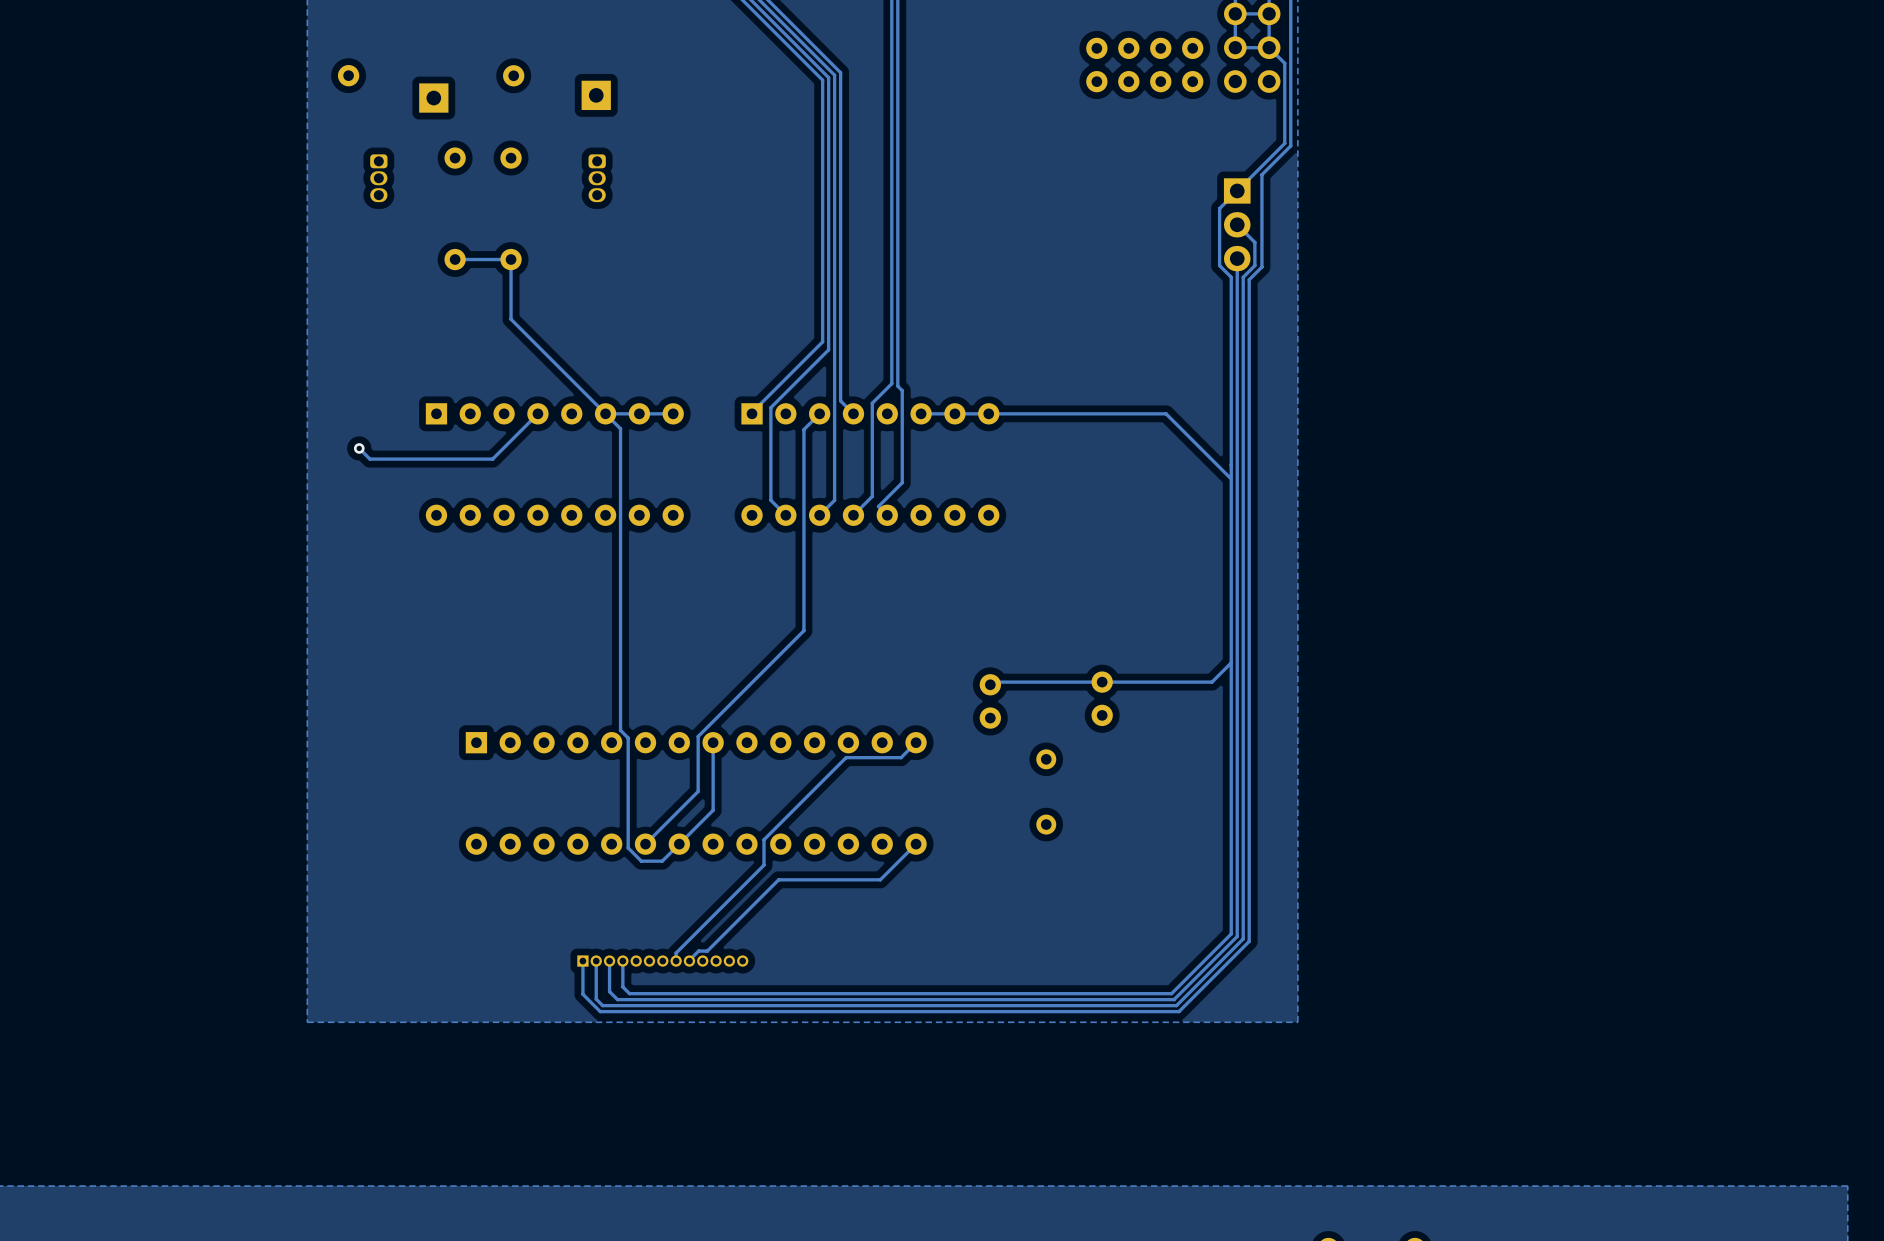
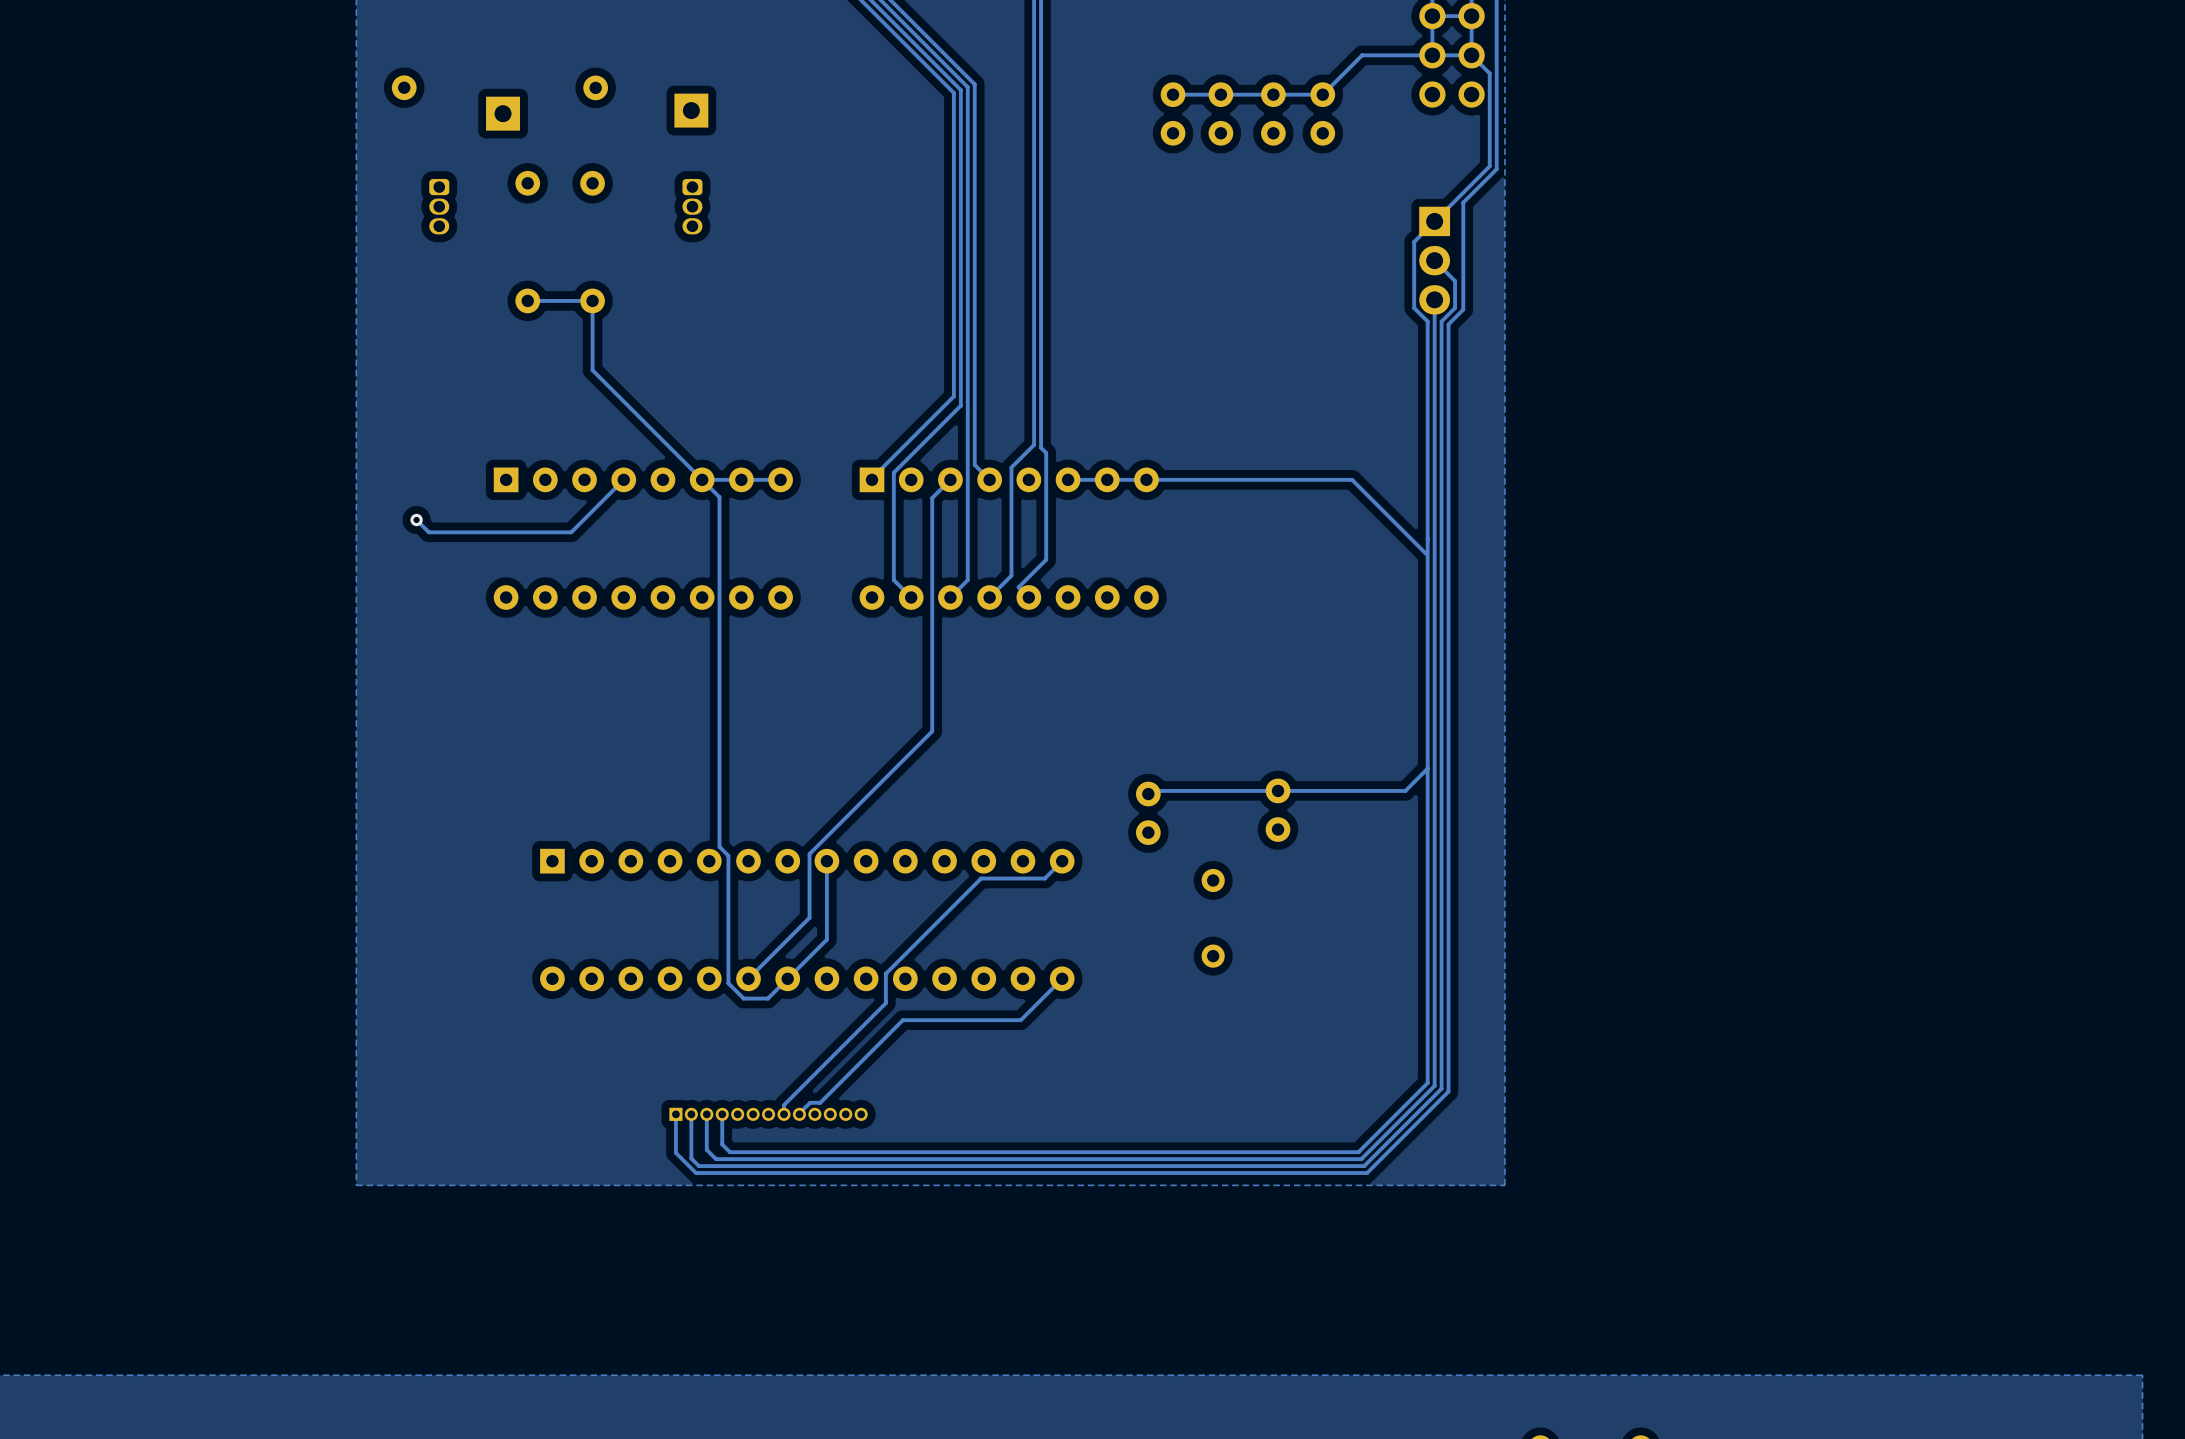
track: none -> (1432, 55) (1362, 55) (1322, 94) (1167, 94)
part: (1096, 65) -> none
part: (1128, 65) -> none
part: (1160, 65) -> none
part: (1192, 65) -> none
part: none -> (1173, 113)
part: none -> (1220, 113)
part: none -> (1273, 113)
part: none -> (1322, 113)

